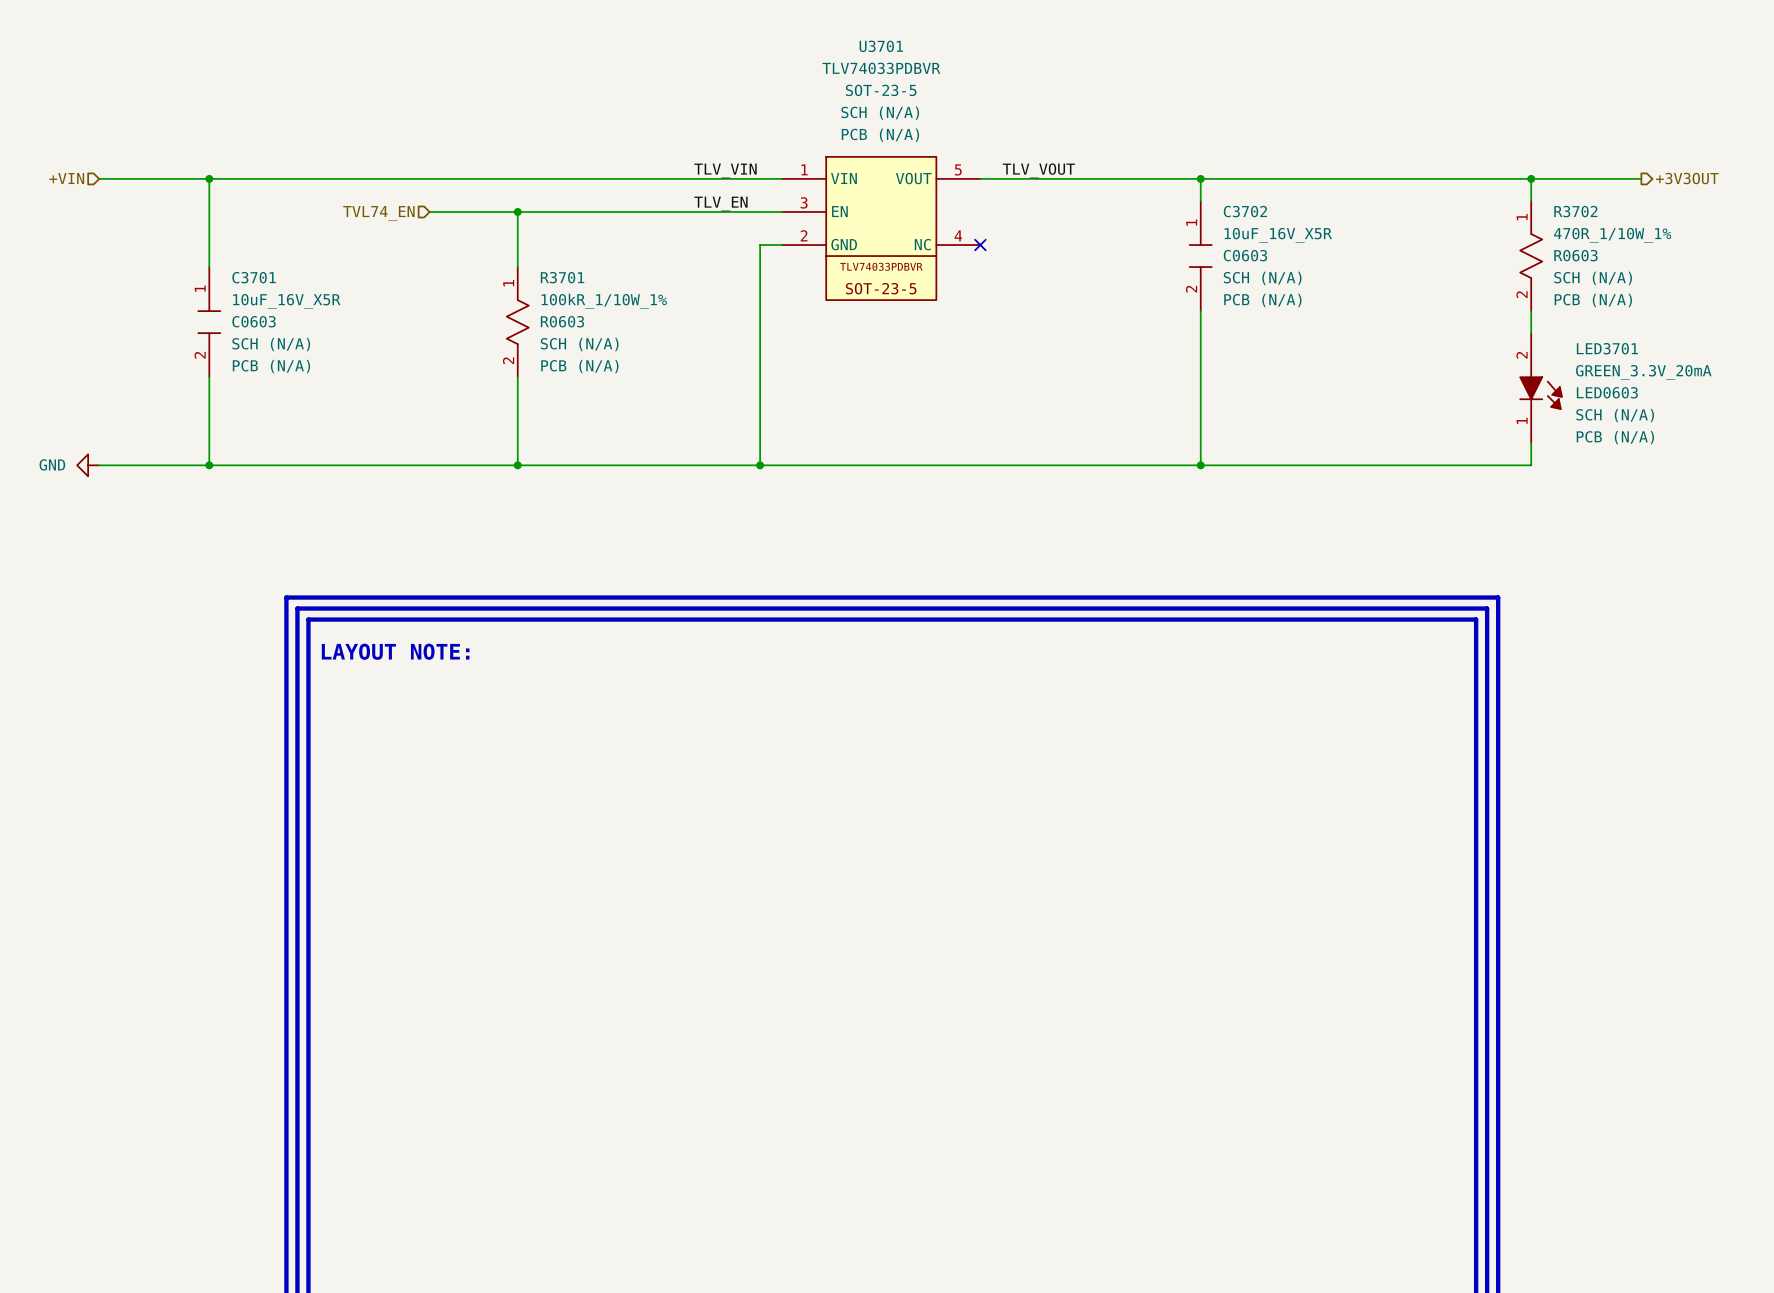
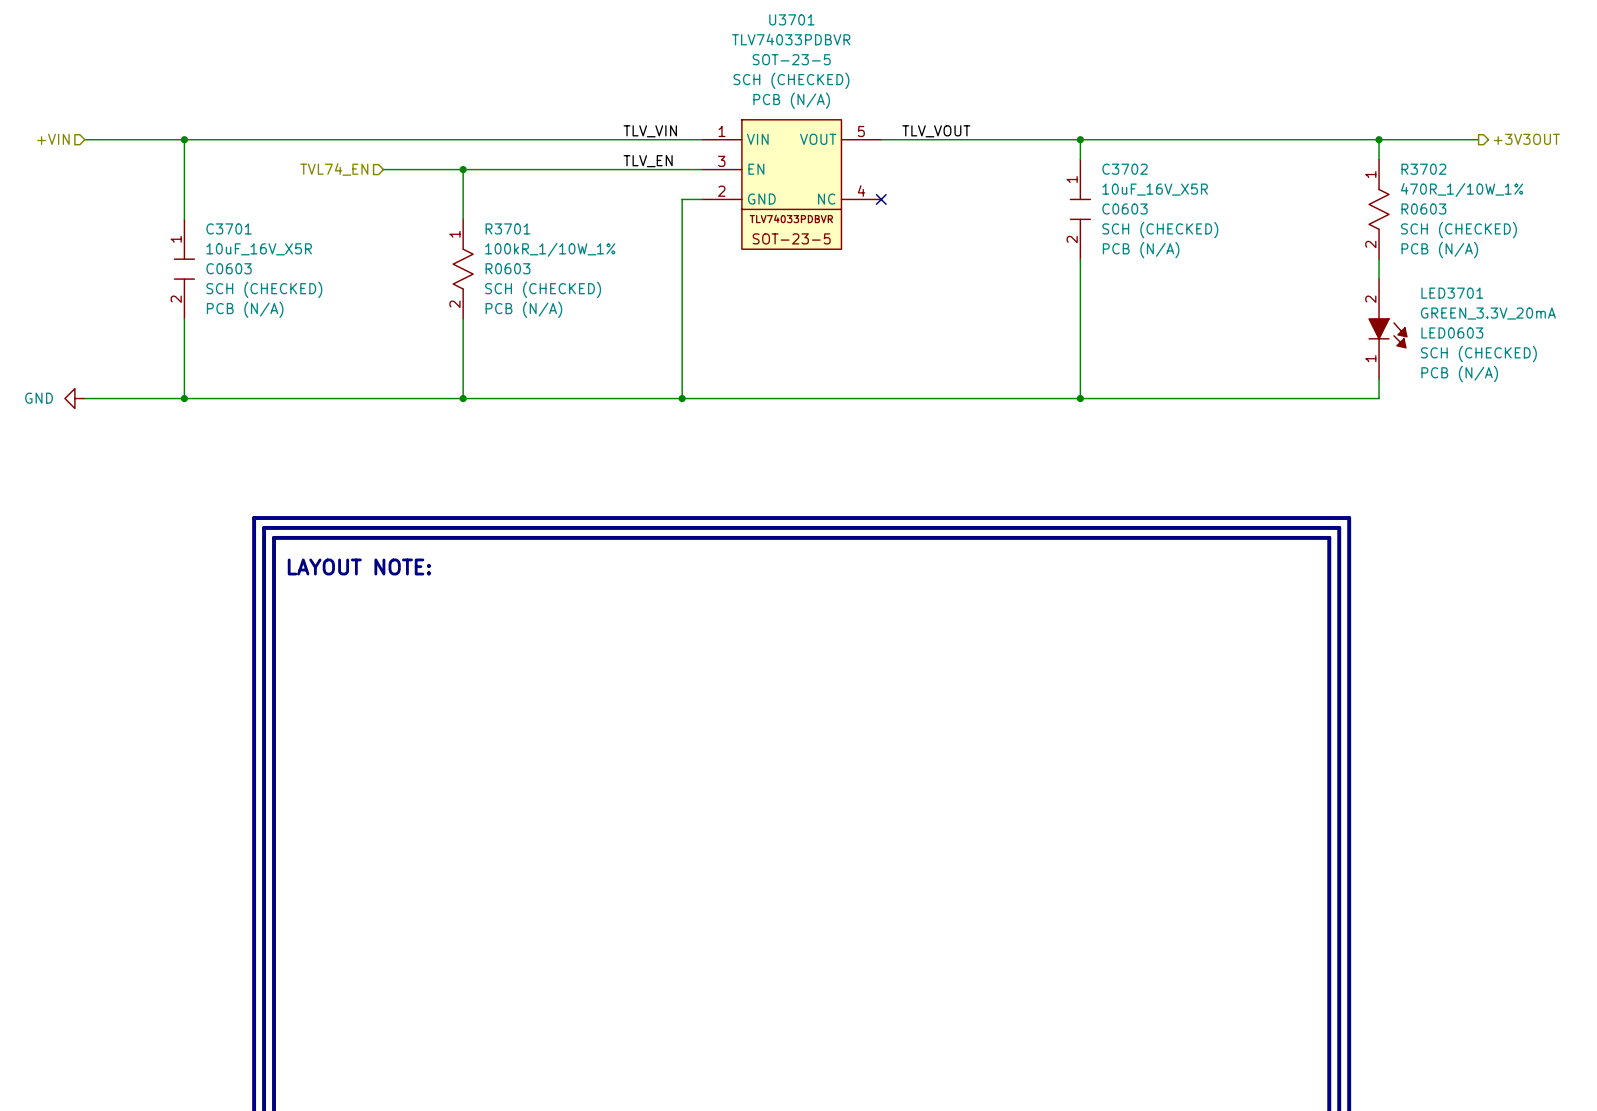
U3701 text: SCH (N/A) (880, 113) -> SCH (CHECKED) (791, 80)
C3702 text: SCH (N/A) (1262, 278) -> SCH (CHECKED) (1160, 230)
R3702 text: SCH (N/A) (1593, 278) -> SCH (CHECKED) (1458, 230)
C3701 text: SCH (N/A) (271, 344) -> SCH (CHECKED) (264, 289)
R3701 text: SCH (N/A) (579, 344) -> SCH (CHECKED) (543, 289)
LED3701 text: SCH (N/A) (1615, 415) -> SCH (CHECKED) (1478, 354)

